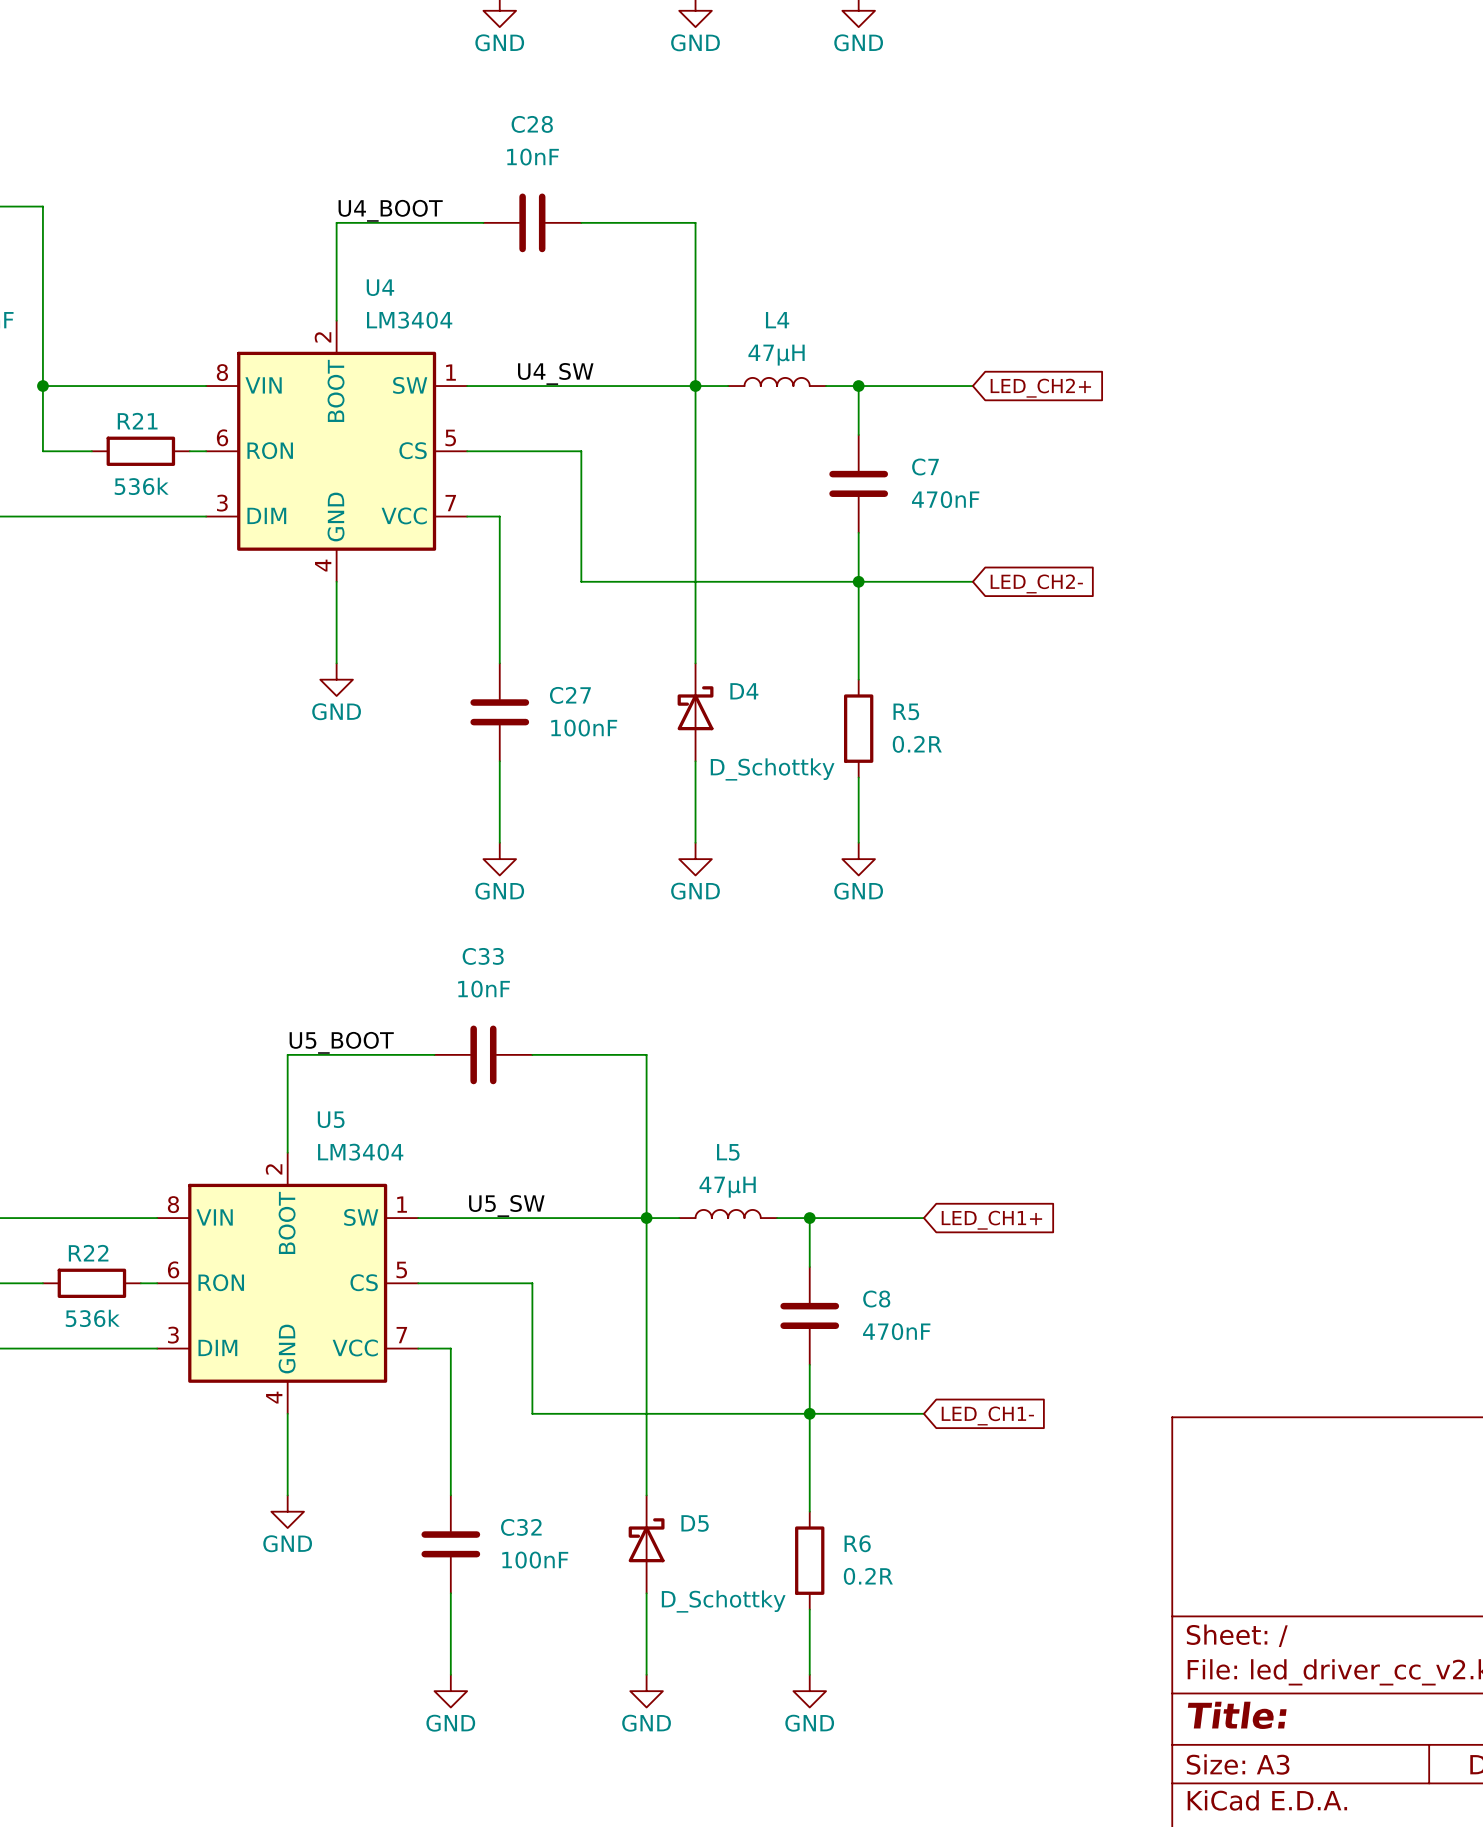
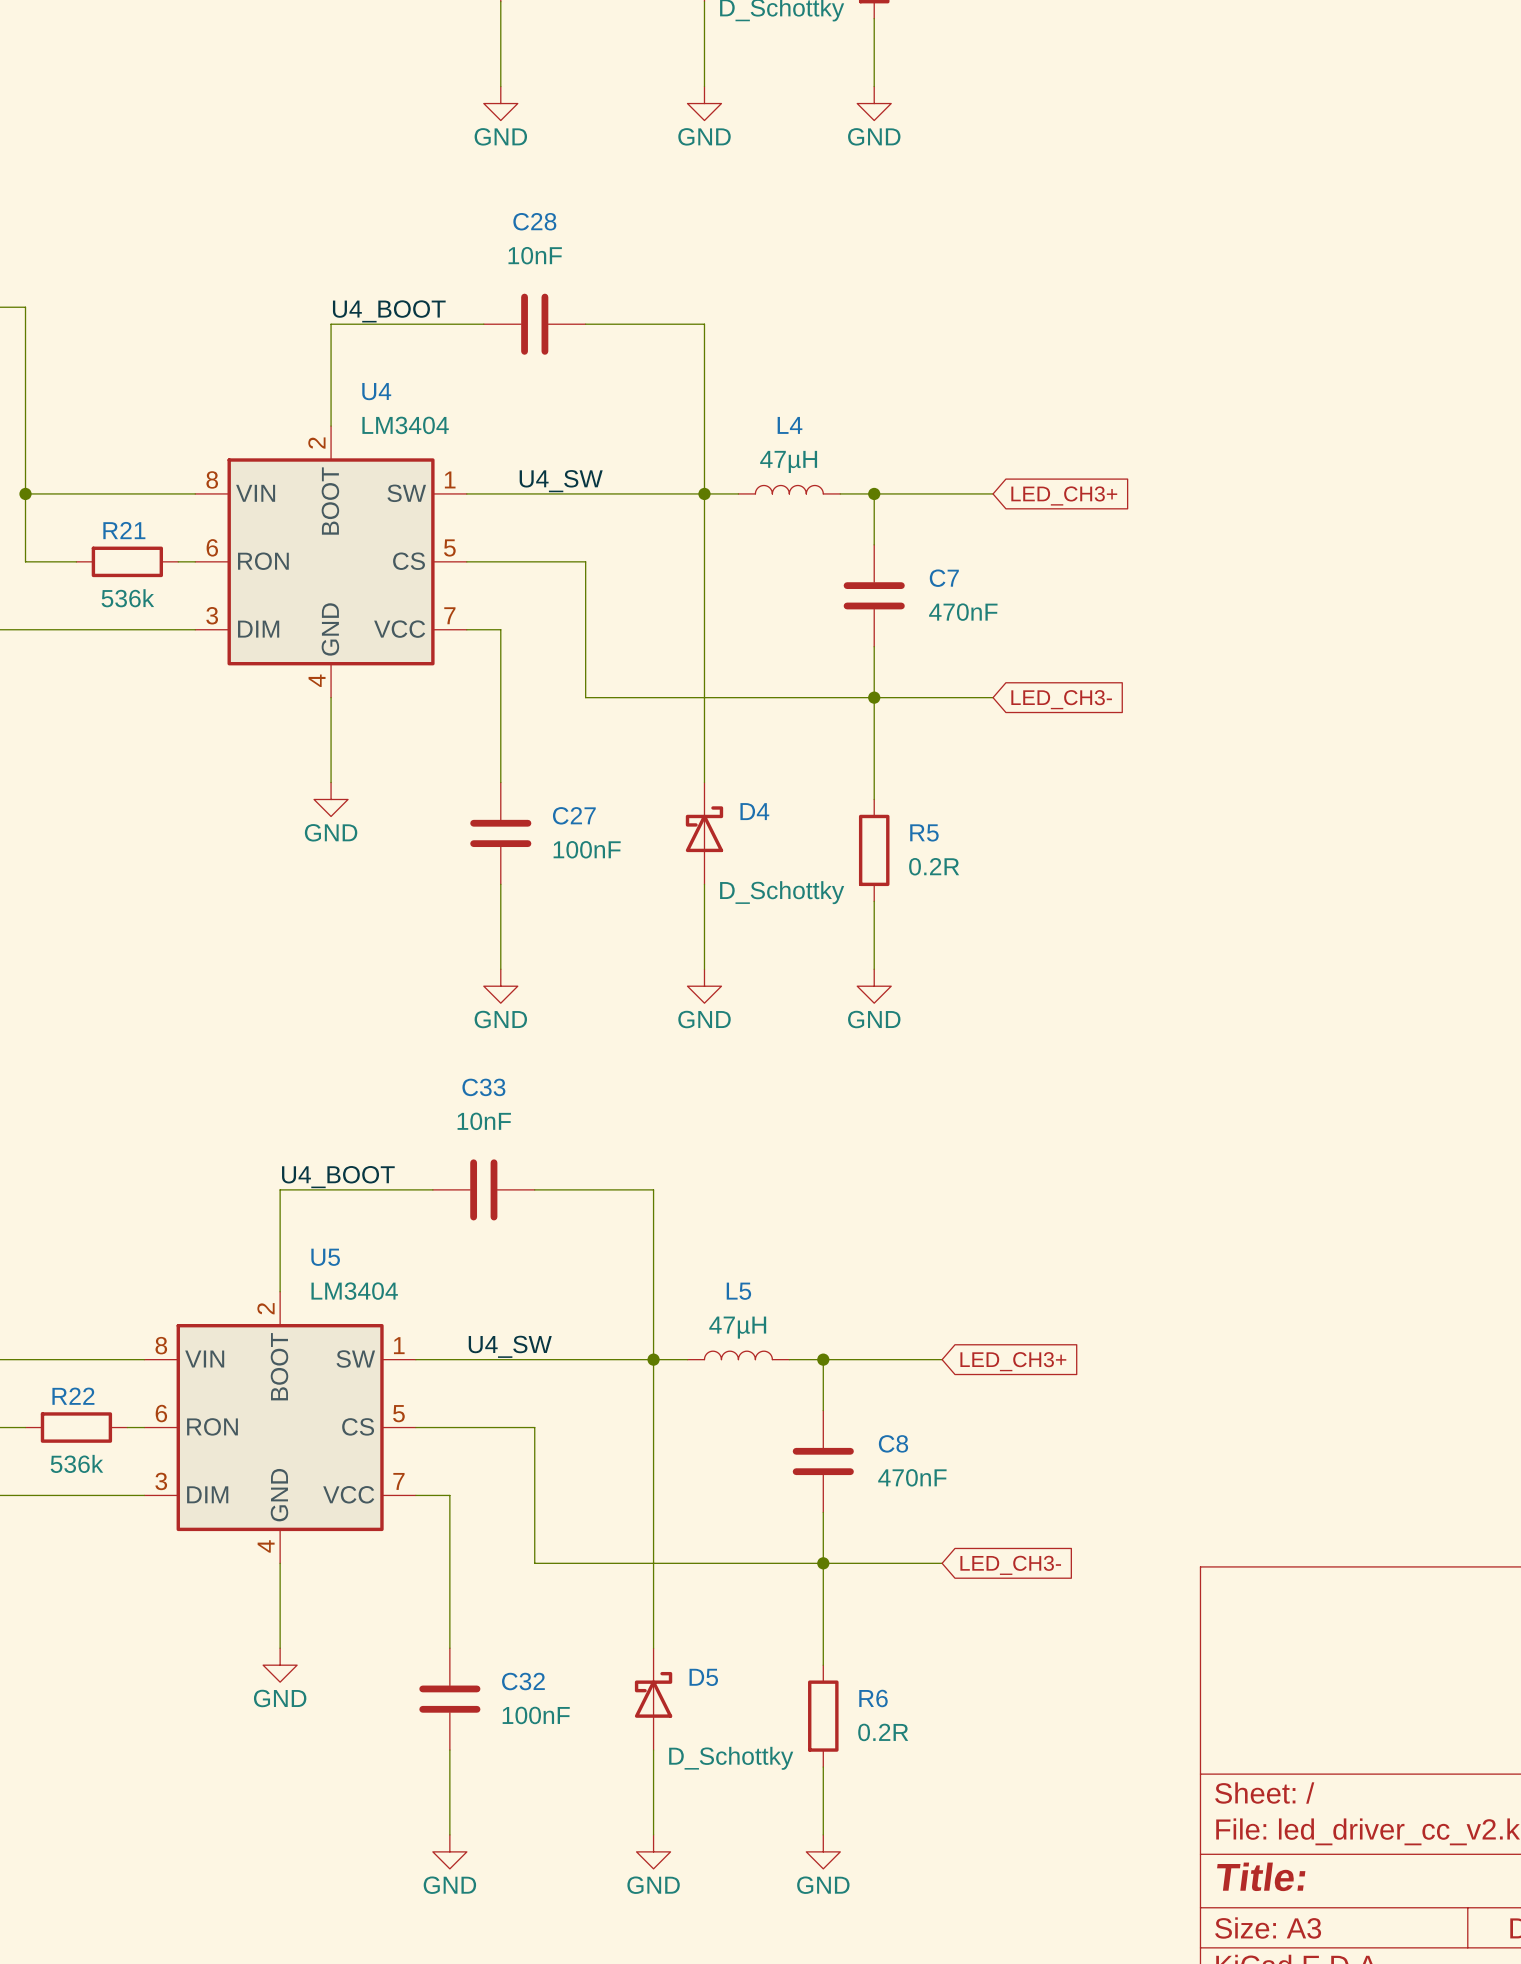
global label: LED_CH2+ (1040, 388) -> LED_CH3+ (1064, 495)
global label: LED_CH2- (1036, 583) -> LED_CH3- (1061, 699)
label: U5_BOOT (341, 1042) -> U4_BOOT (338, 1177)
label: U5_SW (506, 1205) -> U4_SW (510, 1346)
global label: LED_CH1+ (991, 1220) -> LED_CH3+ (1013, 1361)
global label: LED_CH1- (987, 1415) -> LED_CH3- (1010, 1565)

